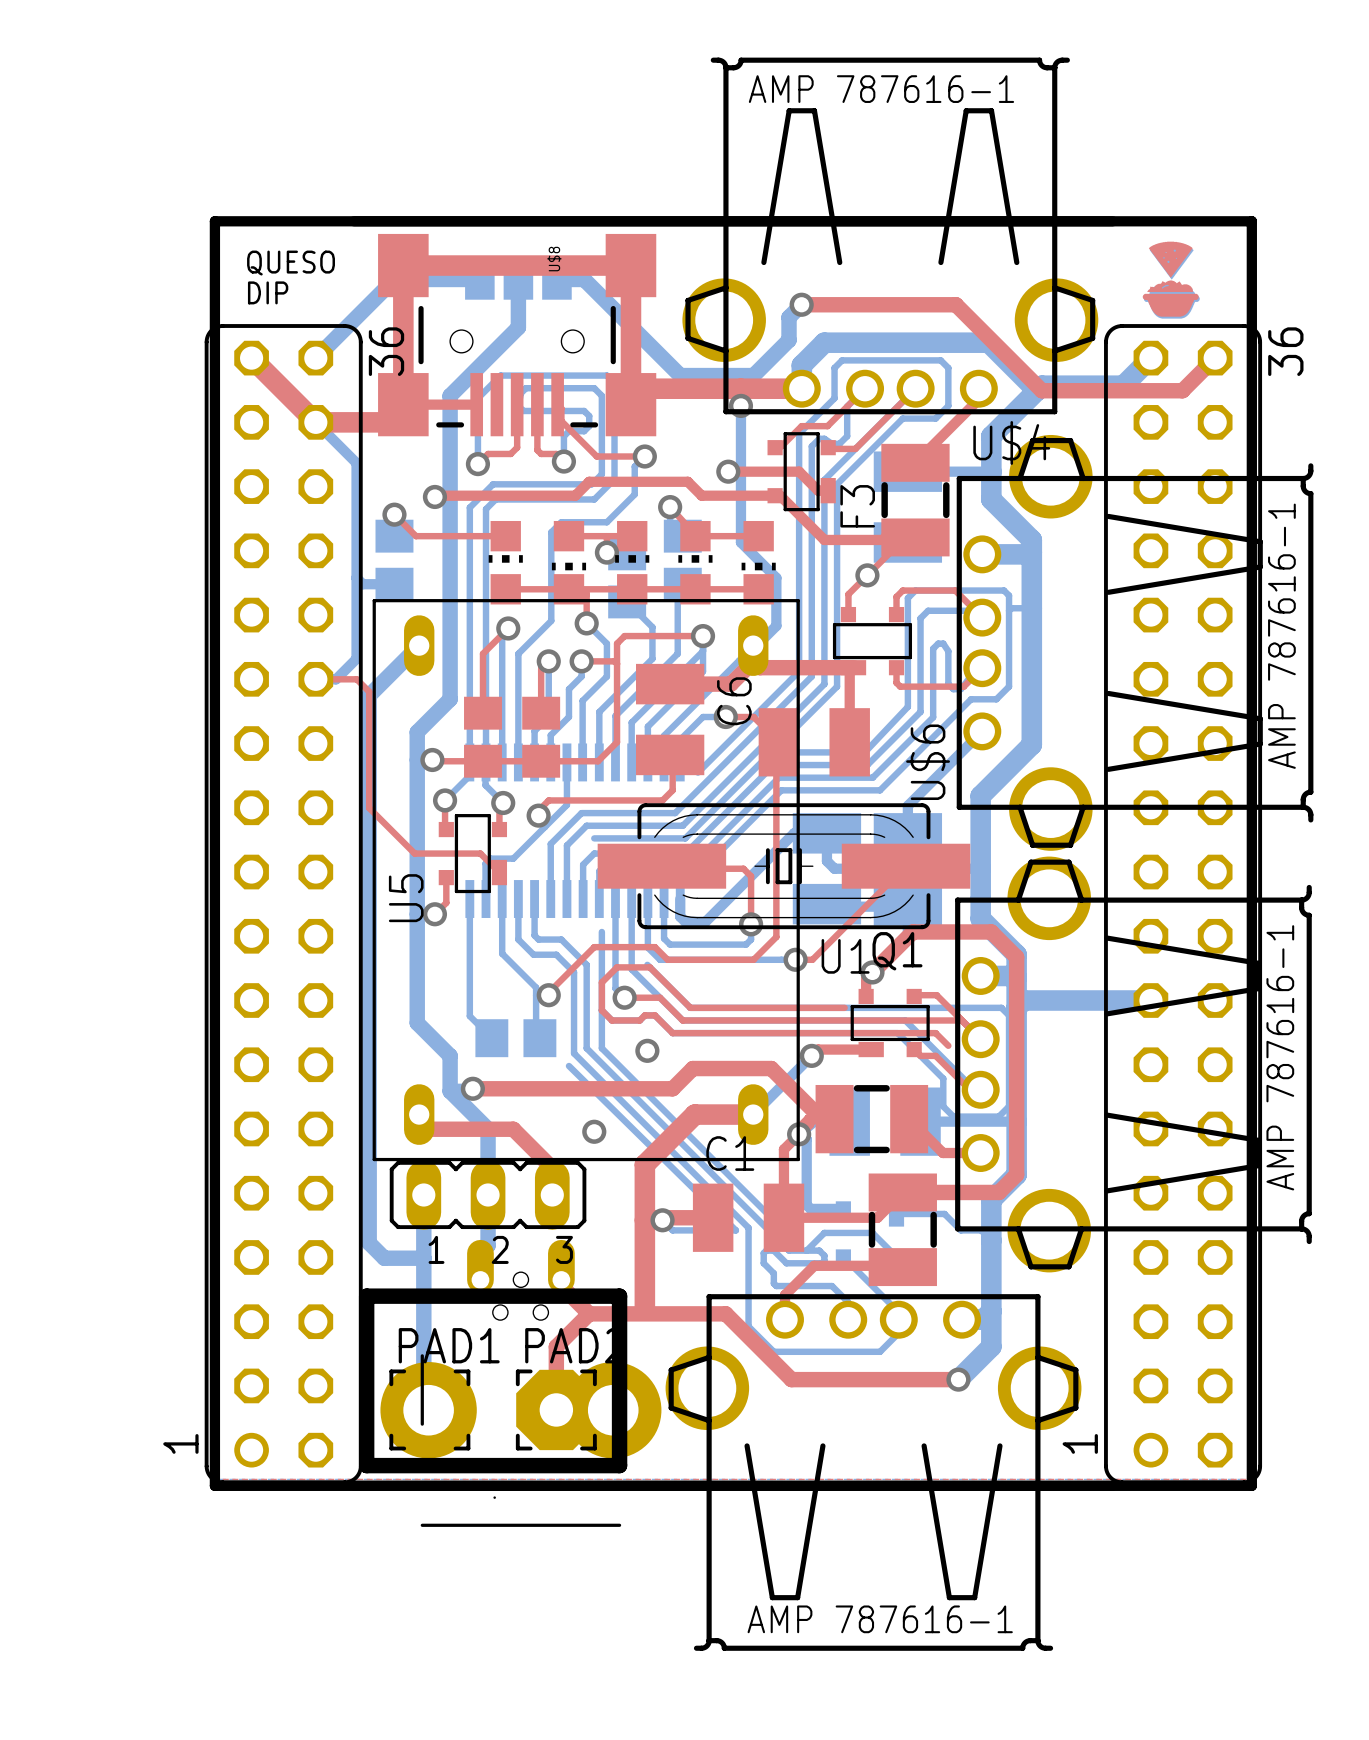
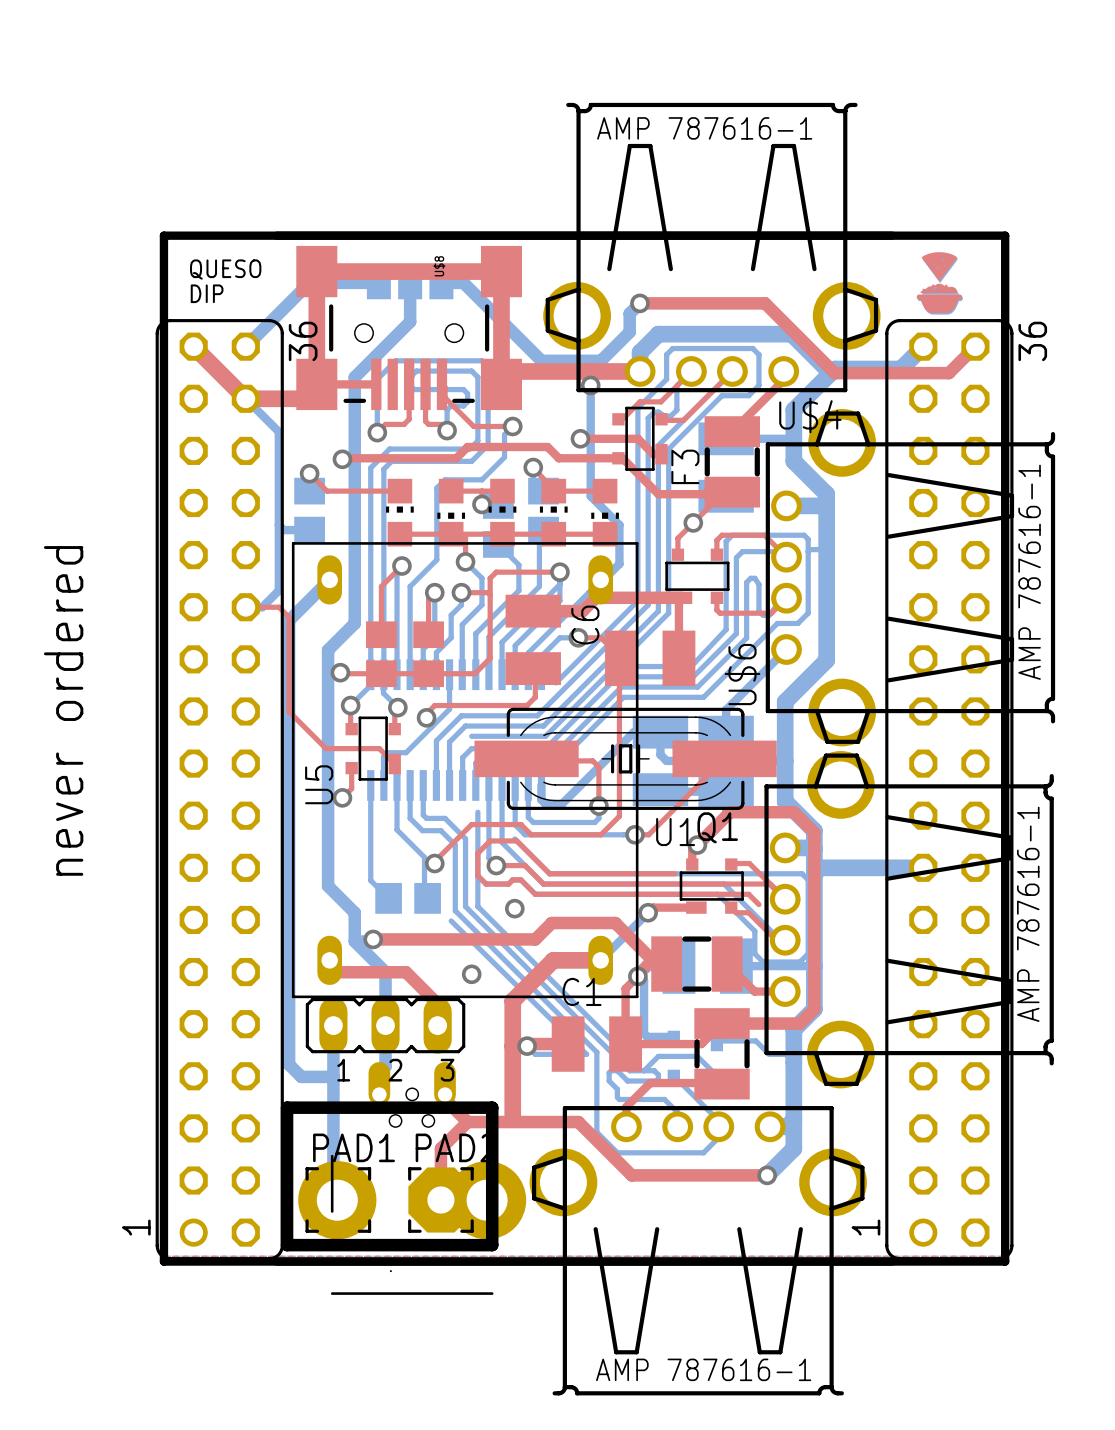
text: none -> never ordered (63, 710)

